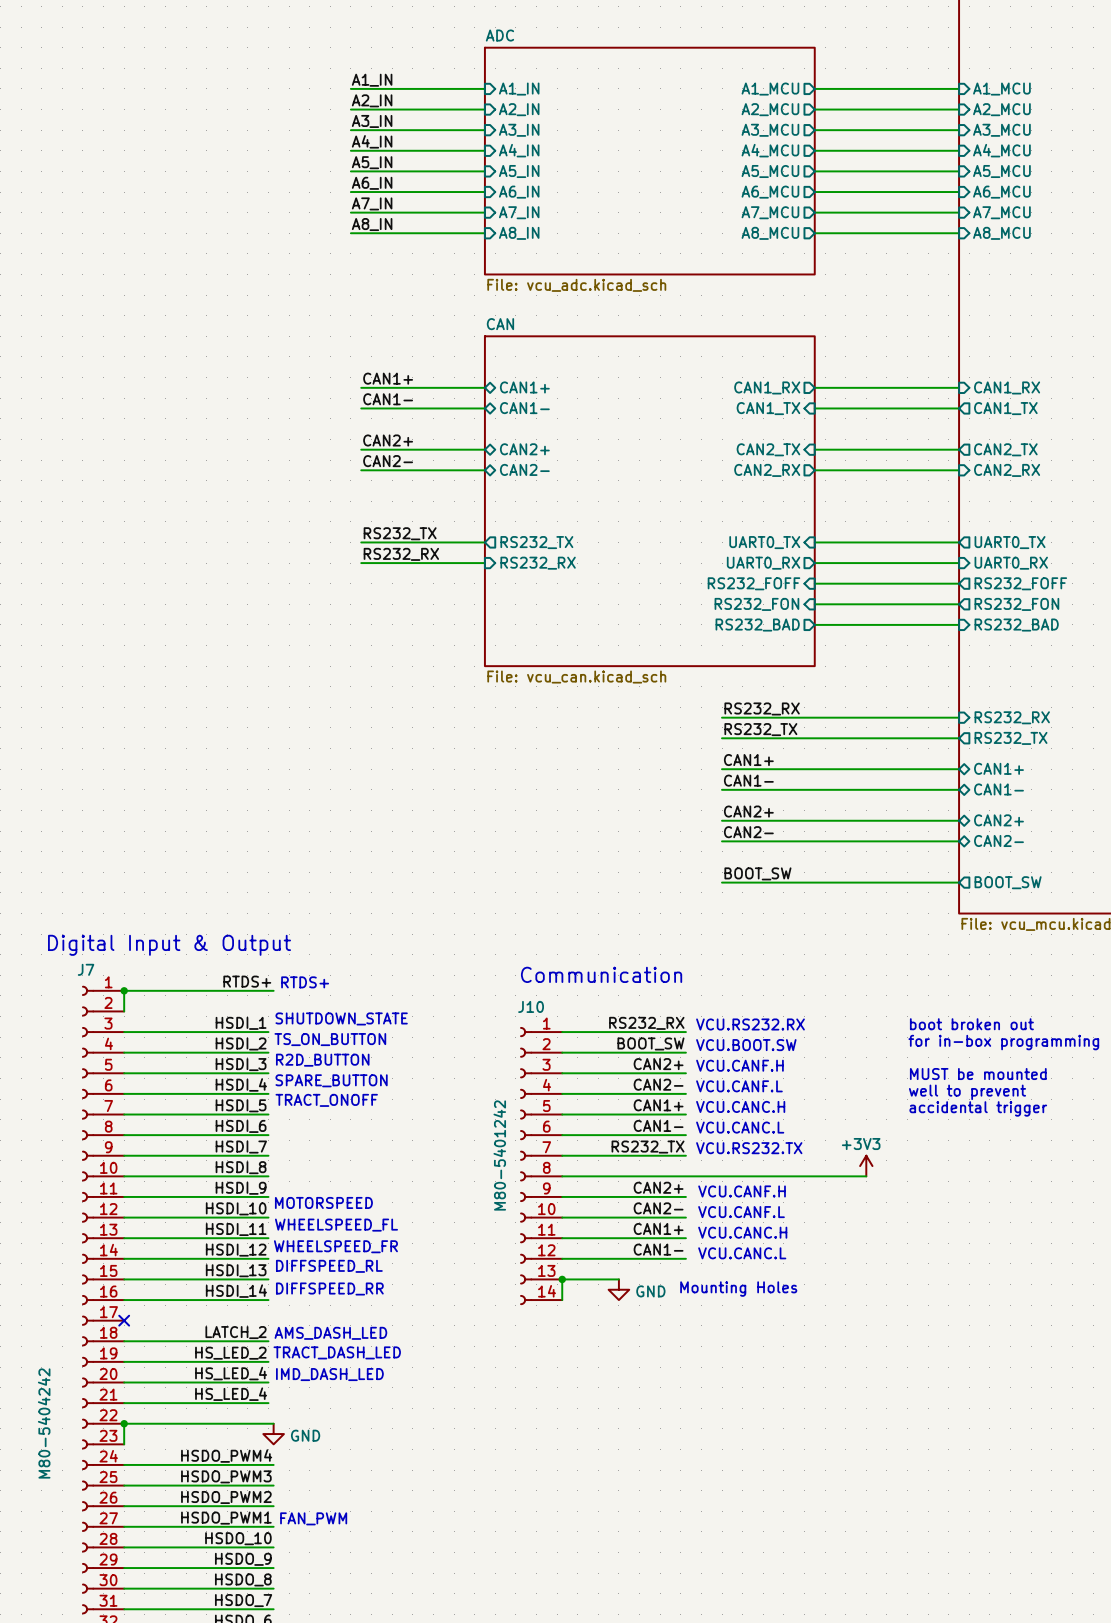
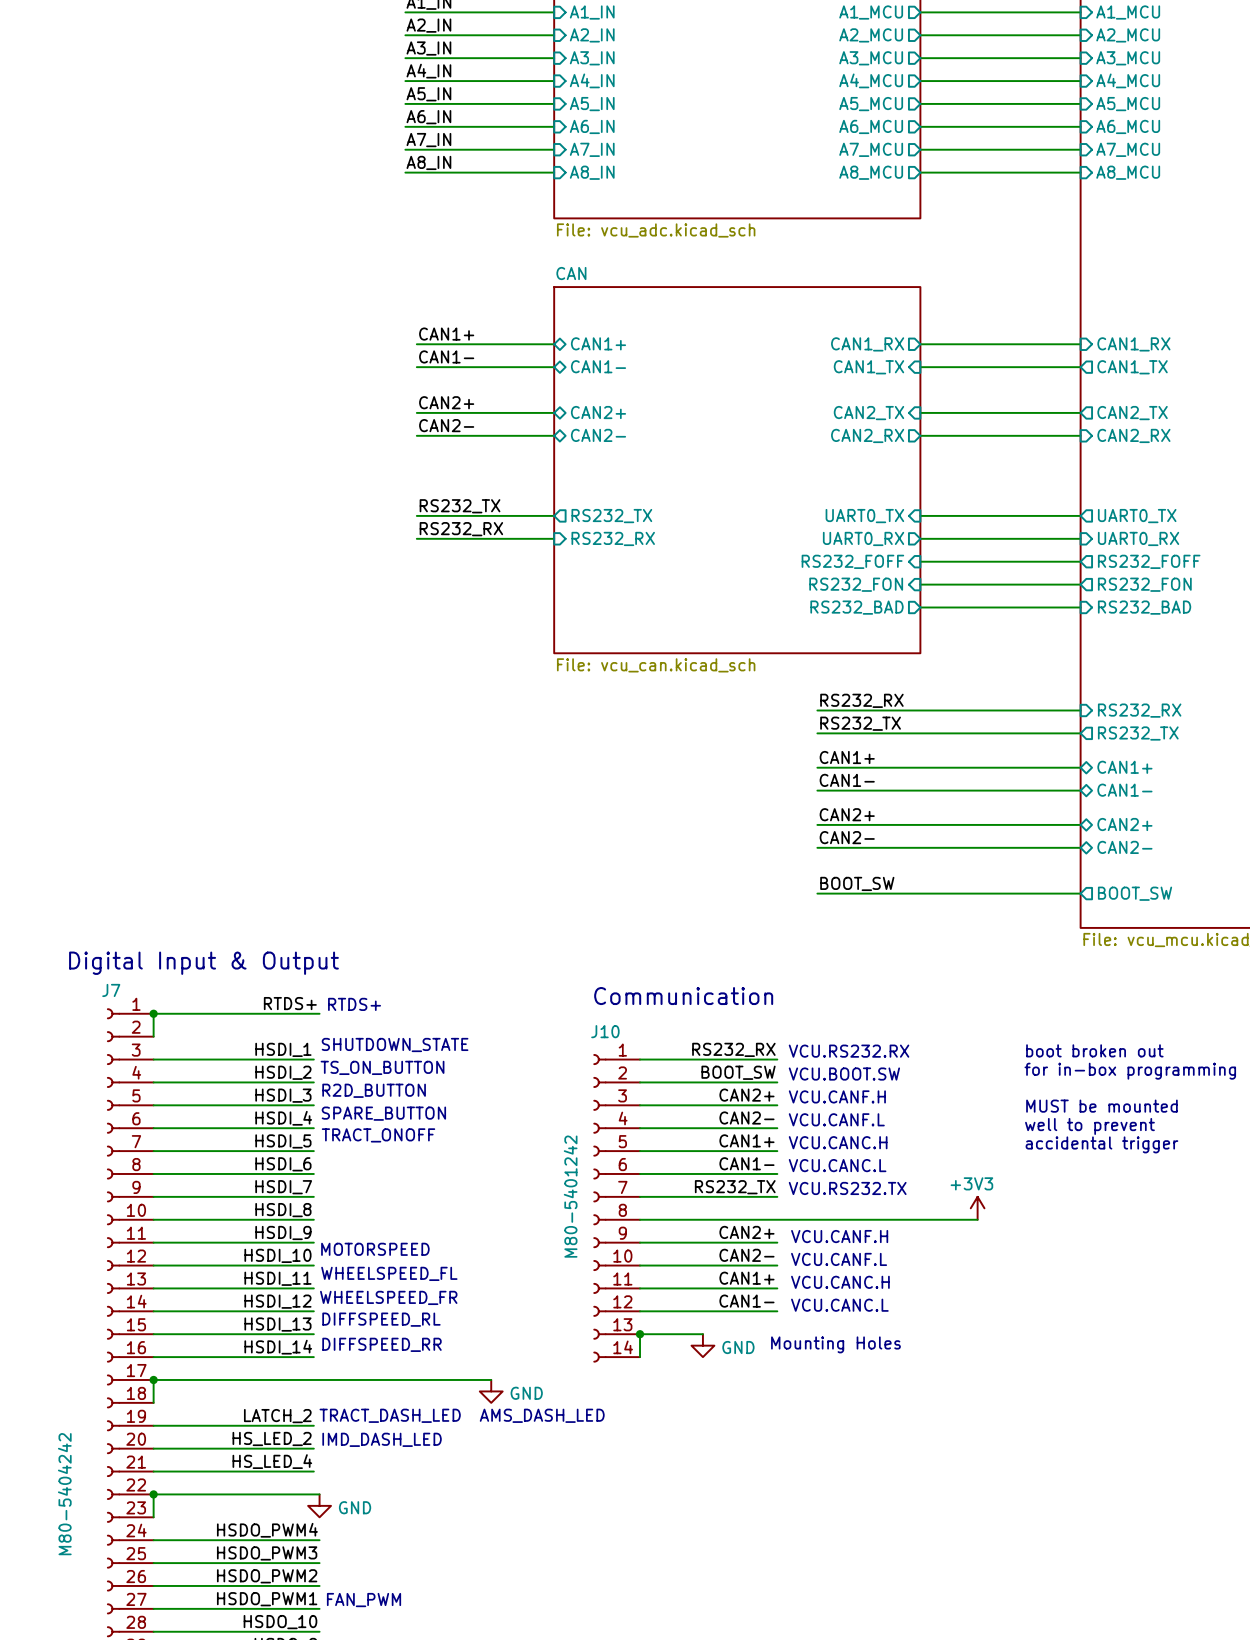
no-connect mark: (124, 1320) -> none
junction: none -> (153, 1379)
power symbol: none -> GND (491, 1391)
label: LATCH_2 (236, 1332) -> none
text position: AMS_DASH_LED (330, 1333) -> AMS_DASH_LED (542, 1415)
wire: (124, 1341) (268, 1341) -> (153, 1402) (153, 1379) (491, 1379)
label: HS_LED_2 (230, 1353) -> LATCH_2 (277, 1416)
label: HS_LED_4 (231, 1373) -> HS_LED_2 (272, 1438)

